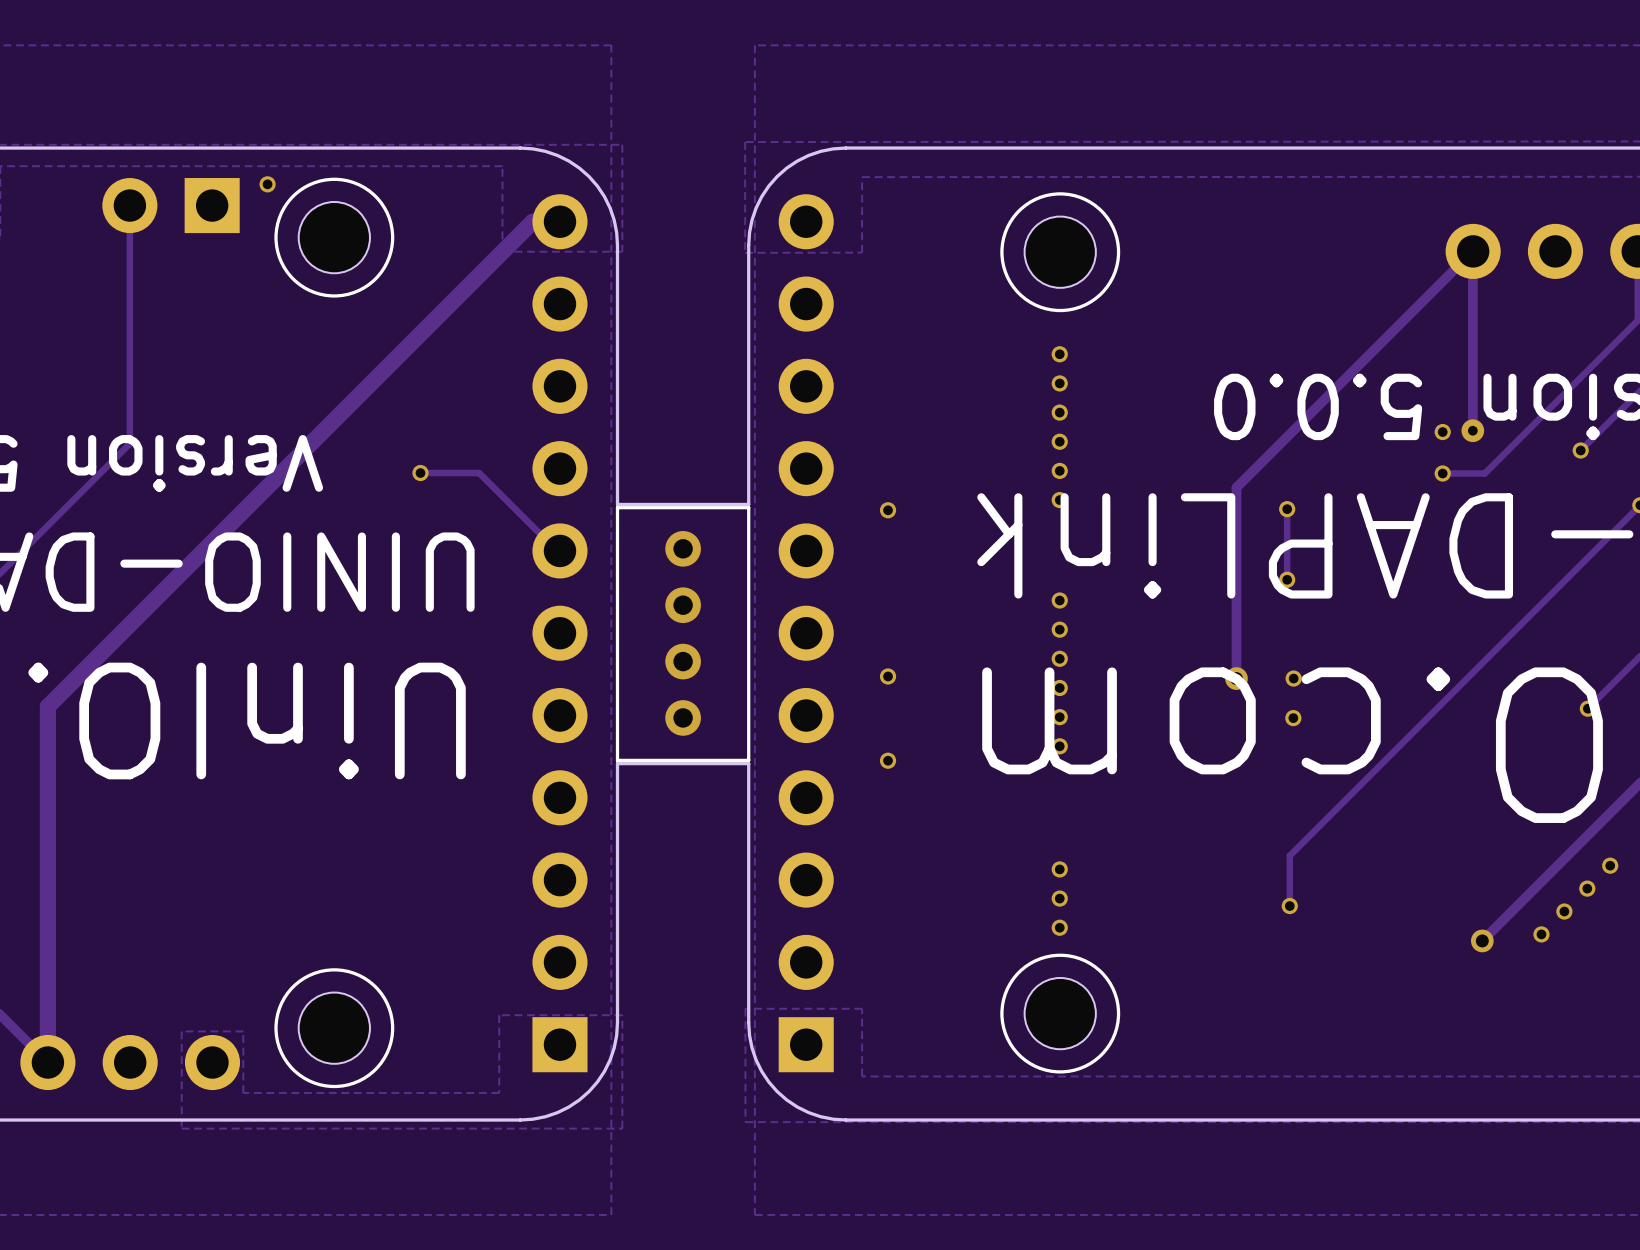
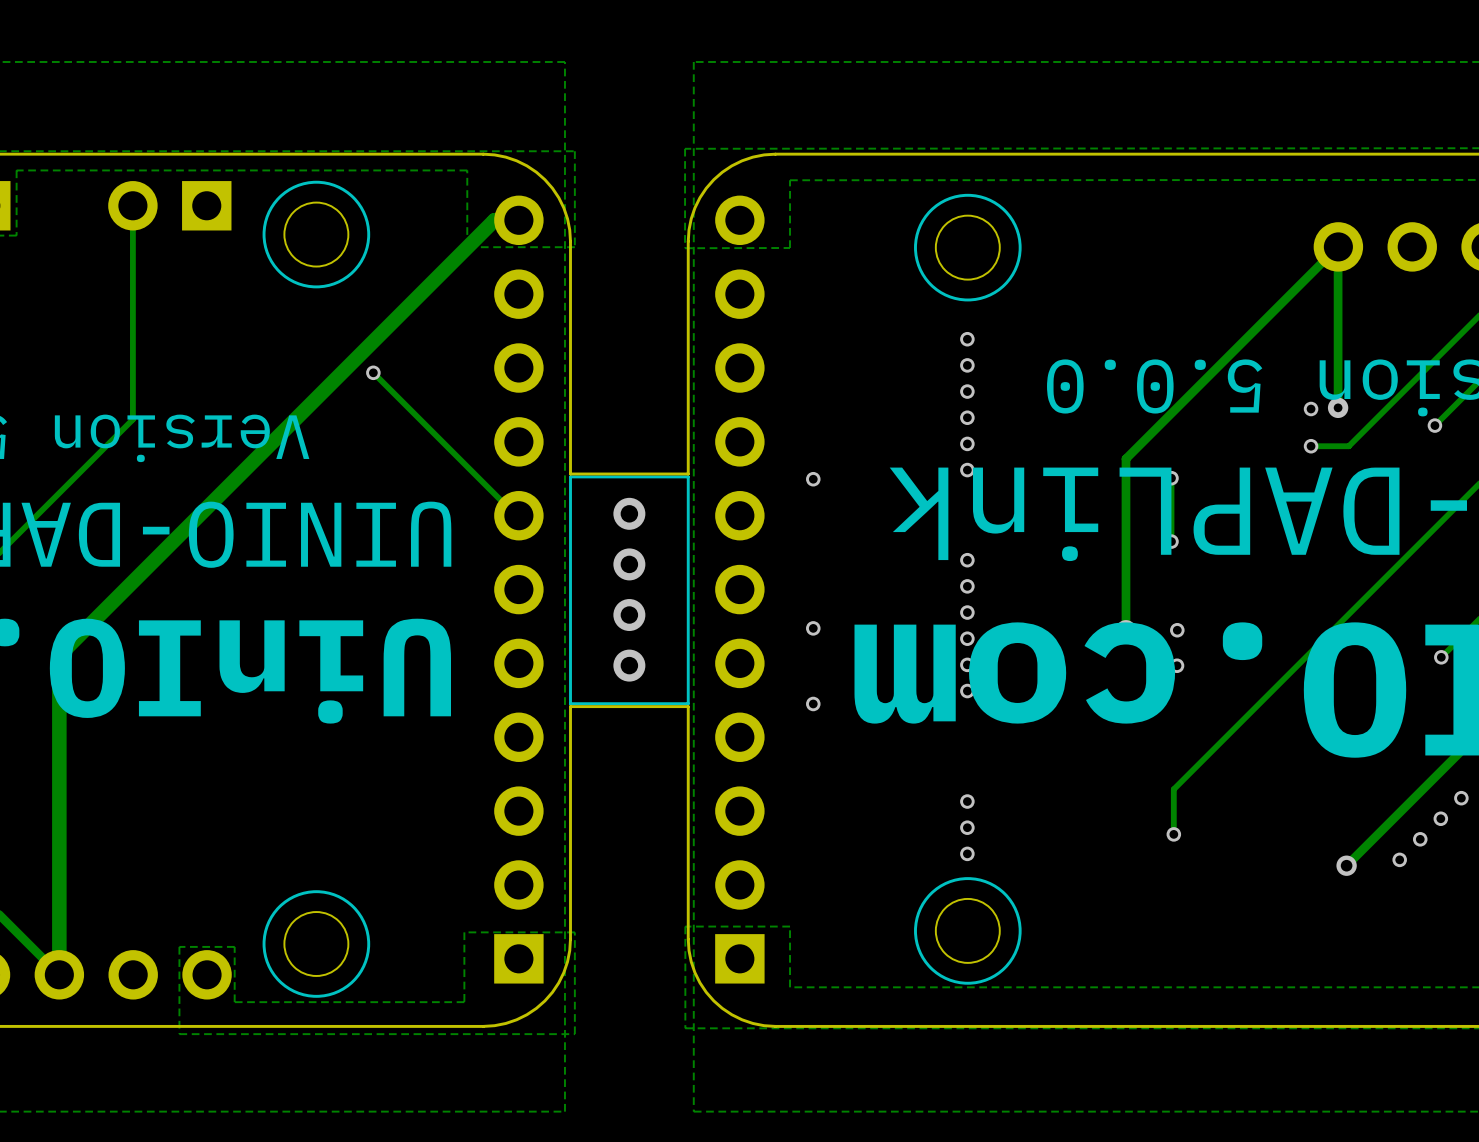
via: (267, 184) -> none
via position: (420, 473) -> (373, 372)
track: (479, 473) (420, 473) -> (446, 445) (373, 372)

